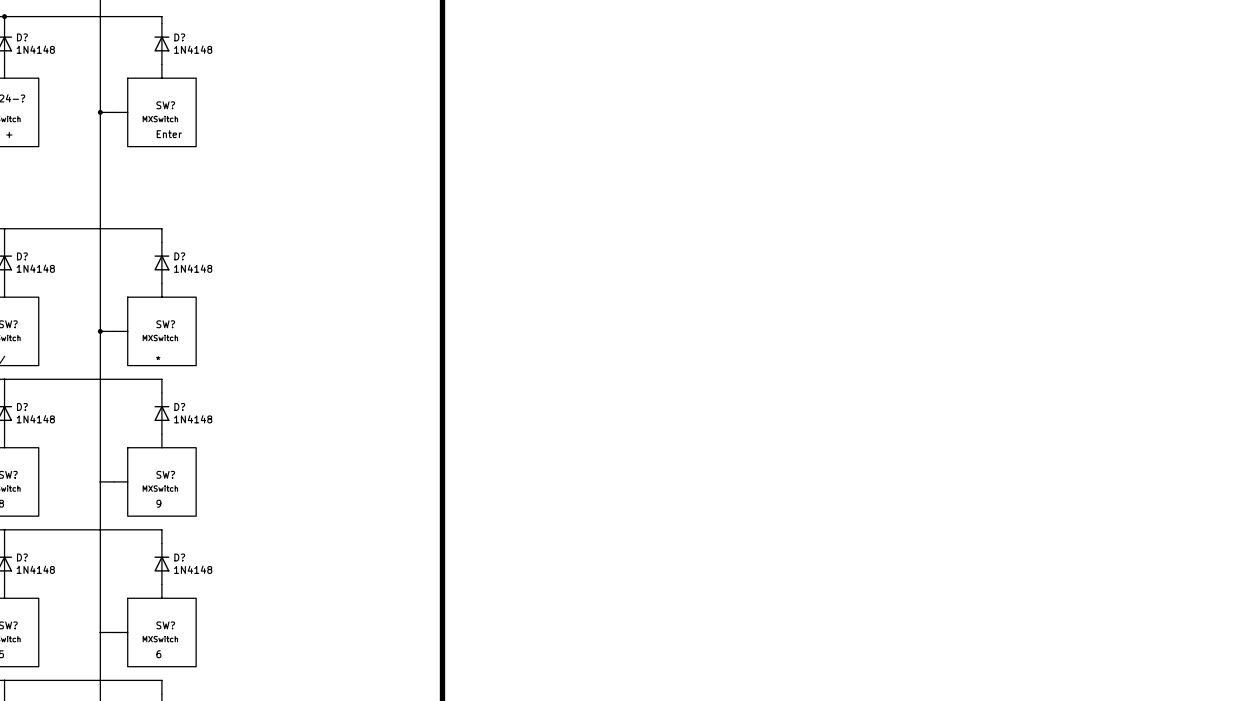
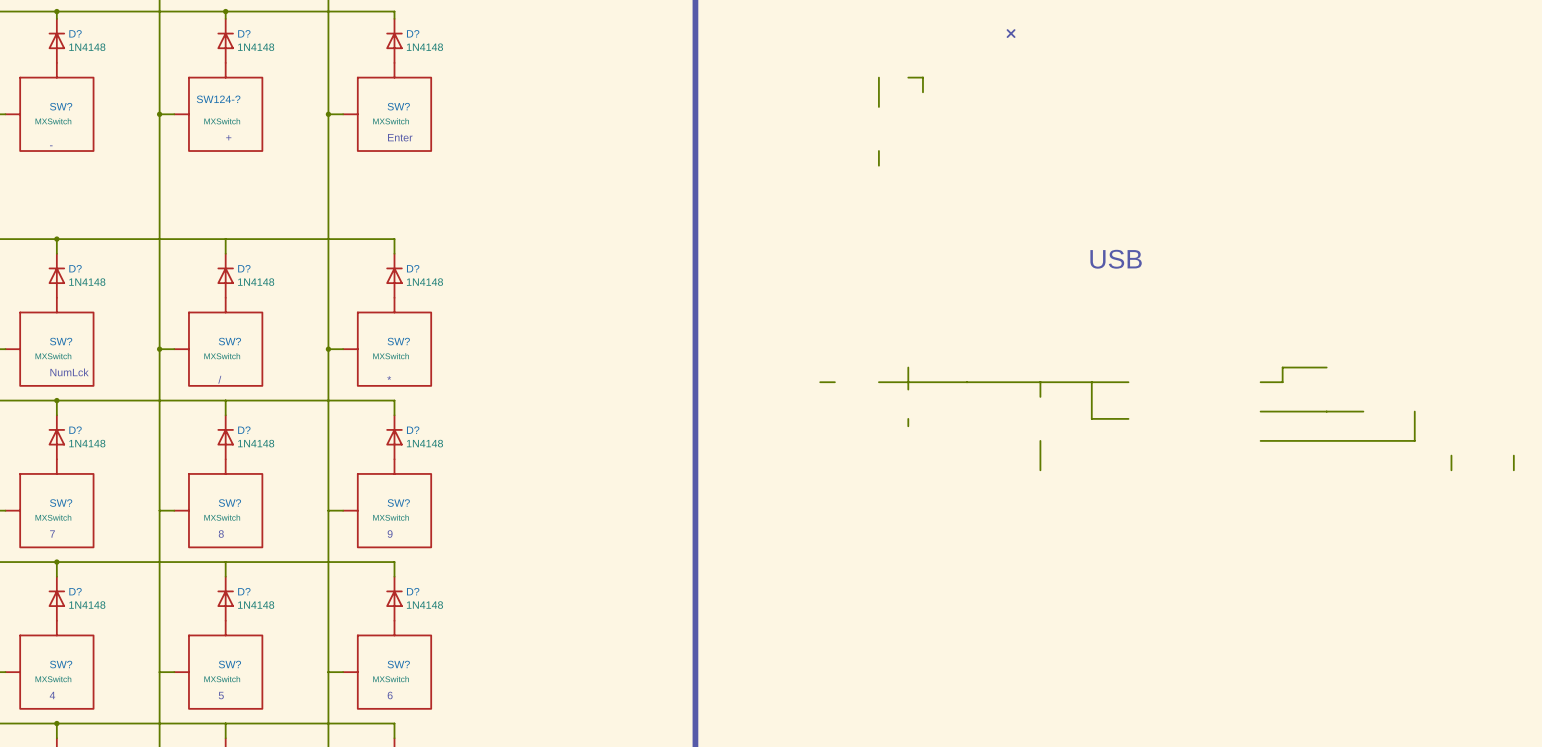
no-connect mark: none -> (1011, 33)
wire: none -> (878, 77) (878, 106)
wire: none -> (908, 77) (922, 77) (922, 92)
wire: none -> (878, 151) (878, 165)
text: none -> USB (1116, 259)
wire: none -> (908, 367) (908, 389)
wire: none -> (1326, 367) (1282, 367) (1282, 382) (1260, 382)
wire: none -> (820, 382) (834, 382)
wire: none -> (878, 382) (1128, 382)
wire: none -> (1040, 382) (1040, 396)
wire: none -> (1091, 382) (1091, 418) (1128, 418)
wire: none -> (1260, 411) (1363, 411)
wire: none -> (1414, 411) (1414, 440) (1260, 440)
wire: none -> (908, 418) (908, 426)
wire: none -> (1040, 440) (1040, 470)
wire: none -> (1451, 455) (1451, 470)
wire: none -> (1513, 455) (1513, 470)

